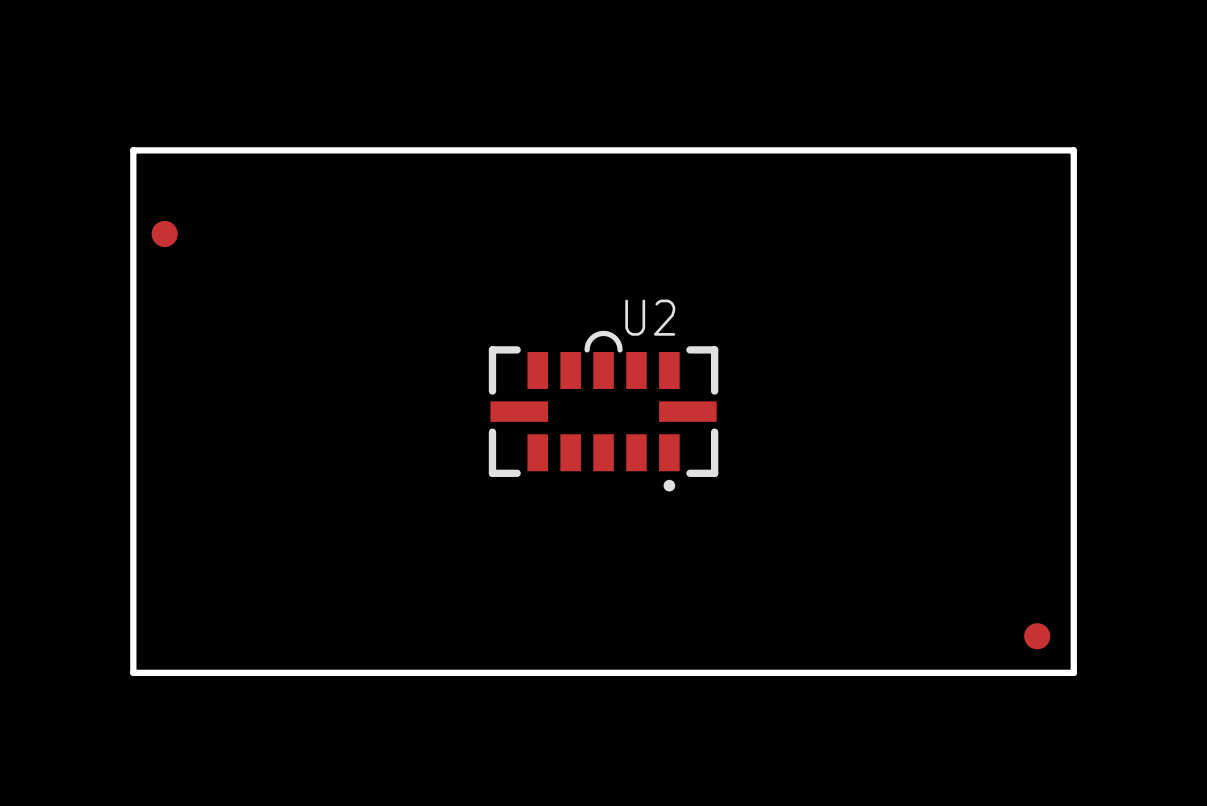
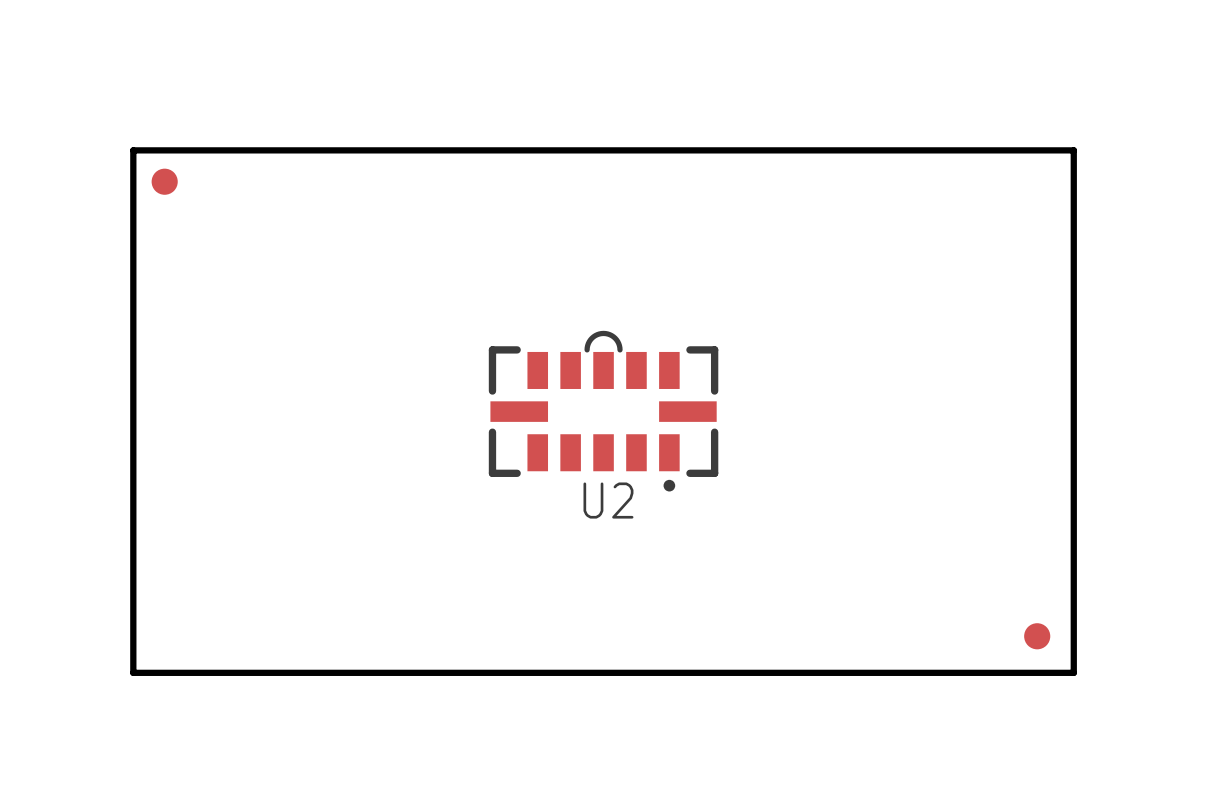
part position: (164, 233) -> (164, 181)
U2 name position: U2 (650, 317) -> U2 (608, 500)

